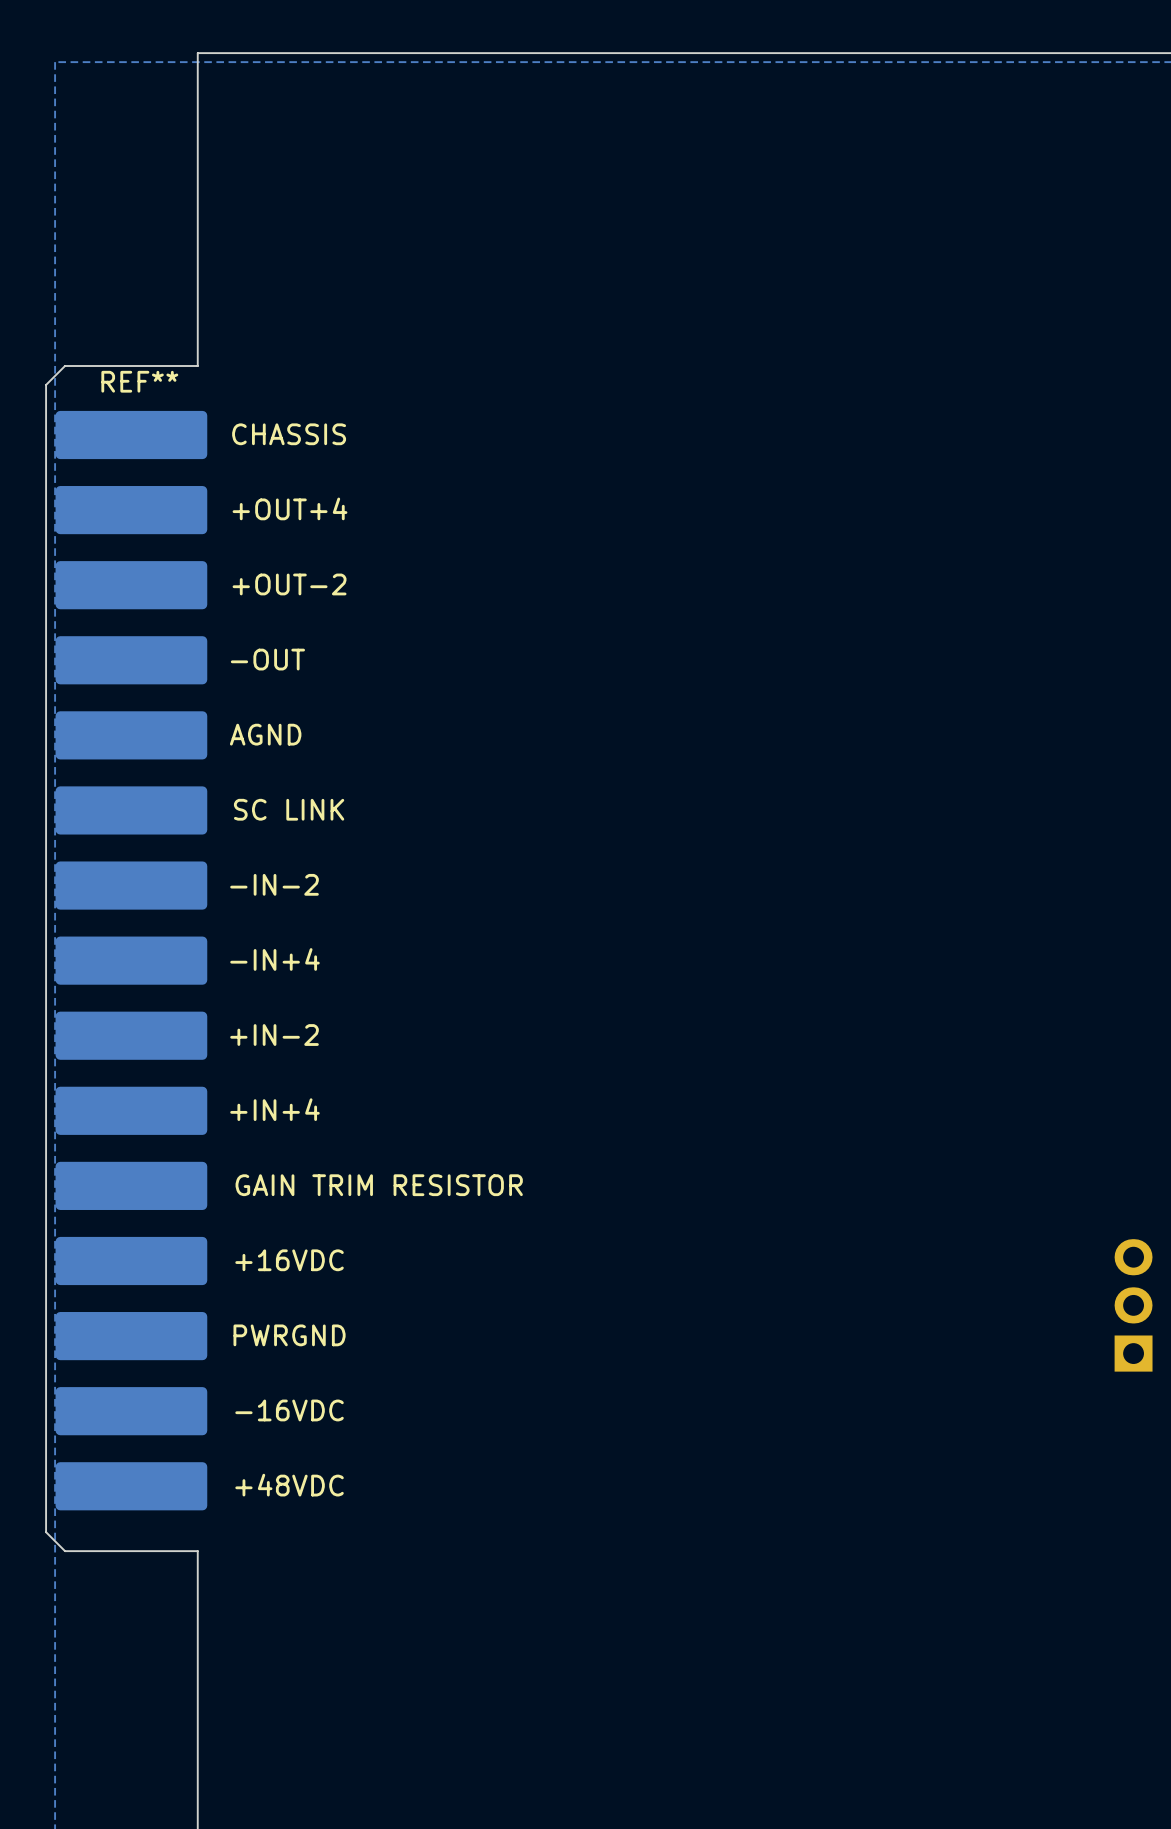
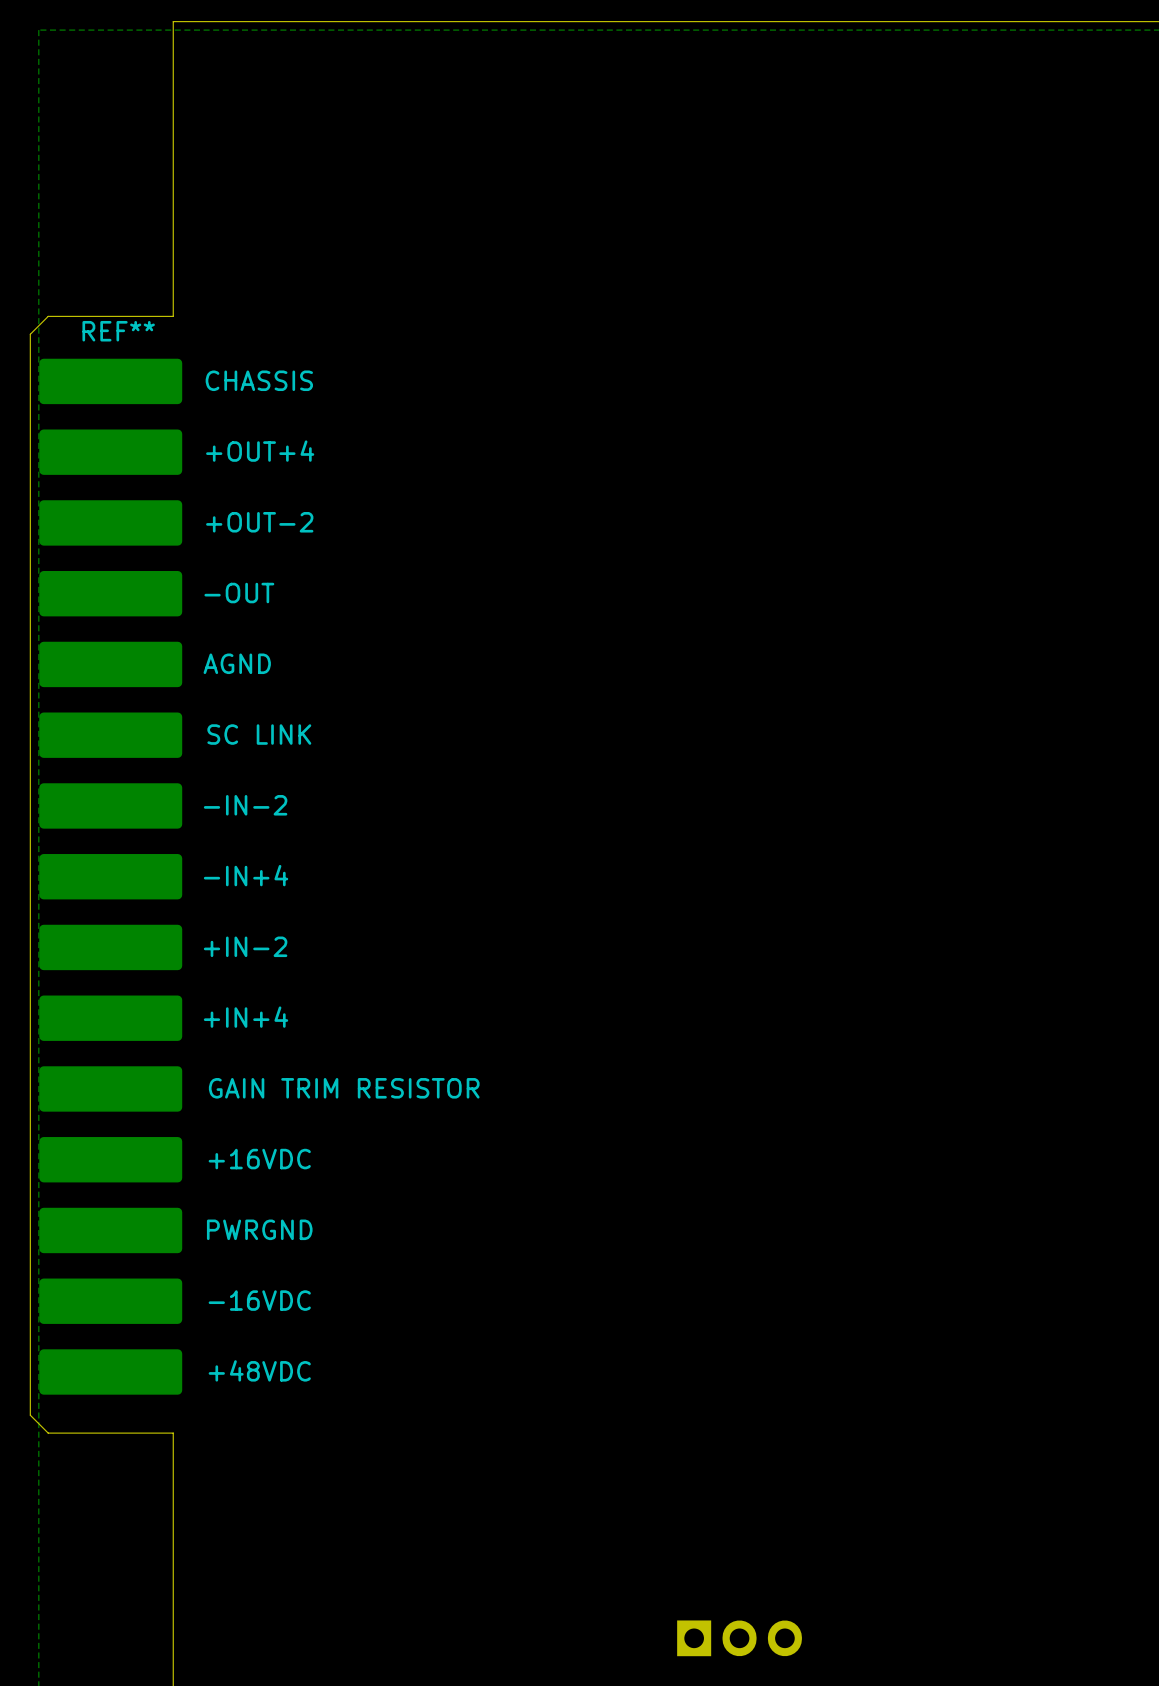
part: (1133, 1305) -> none
part: none -> (739, 1638)

